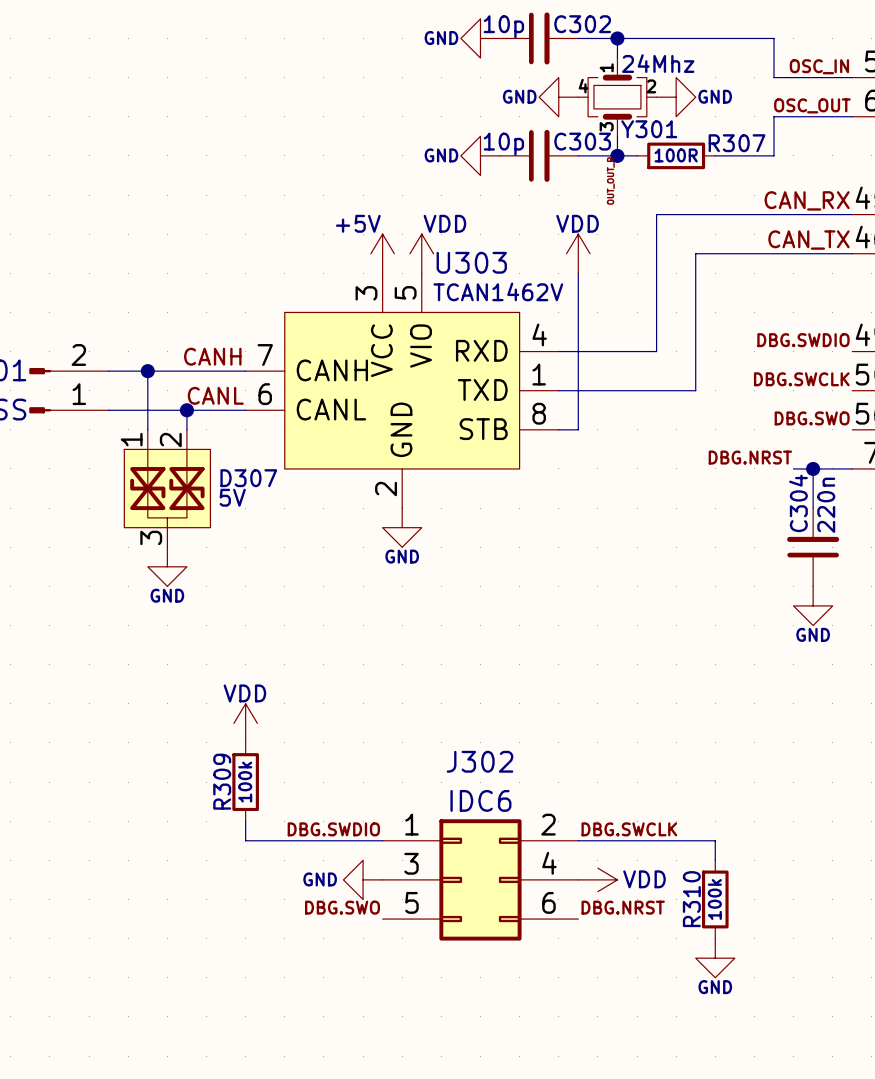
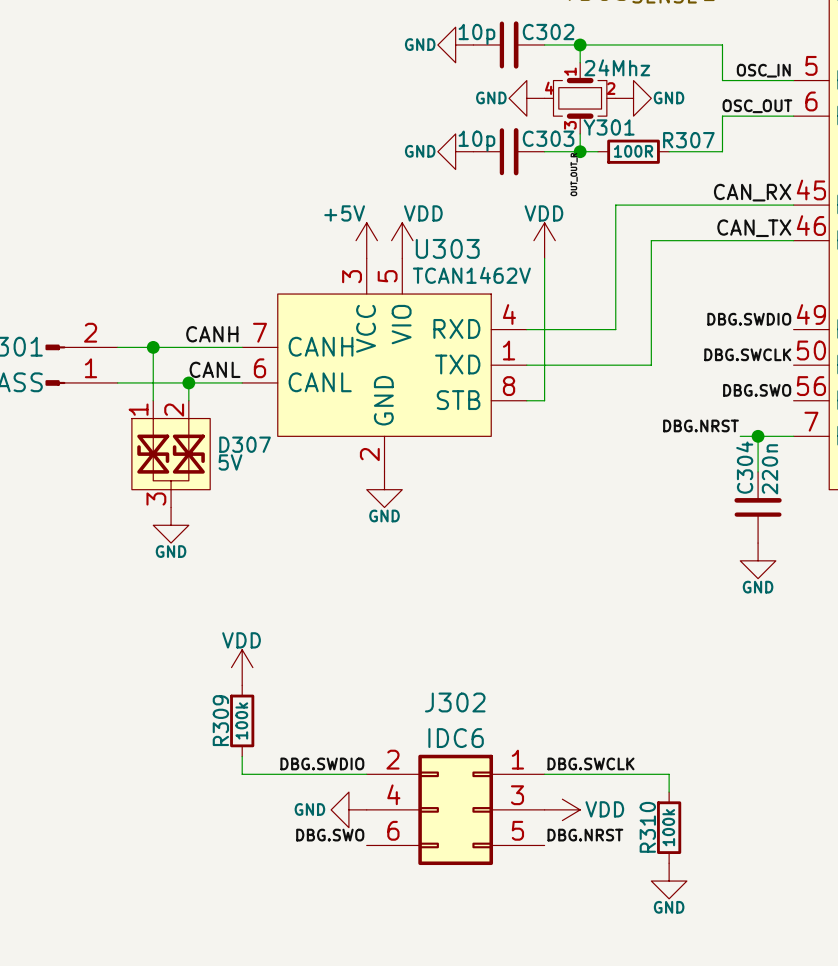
J302 flip: as is (480, 879) -> left-right (455, 809)

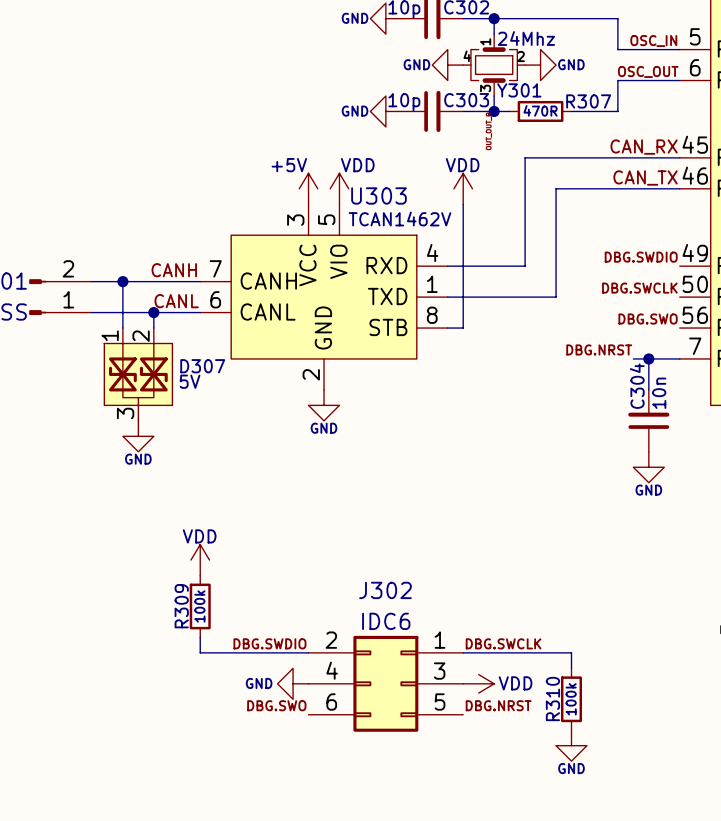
R307 value: 100R (633, 151) -> 470R (540, 110)
C304 value: 220n (769, 469) -> 10n (659, 393)

